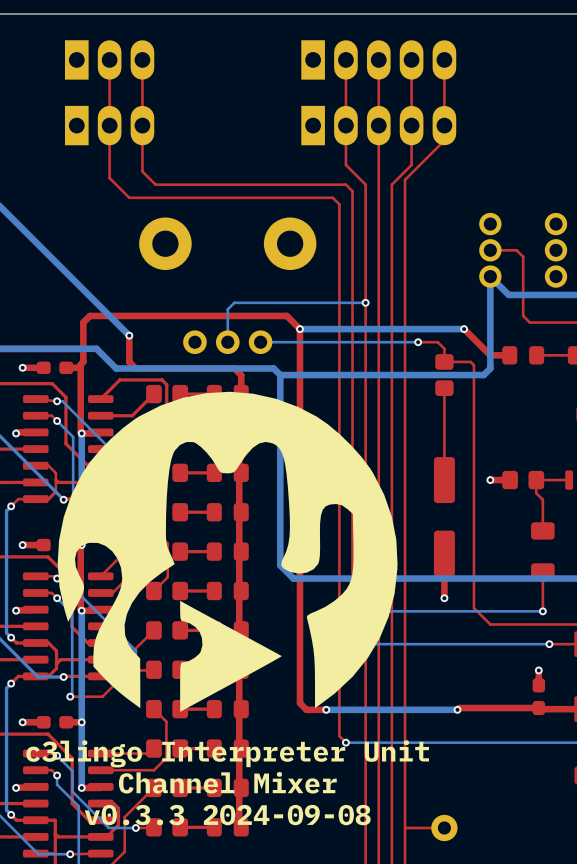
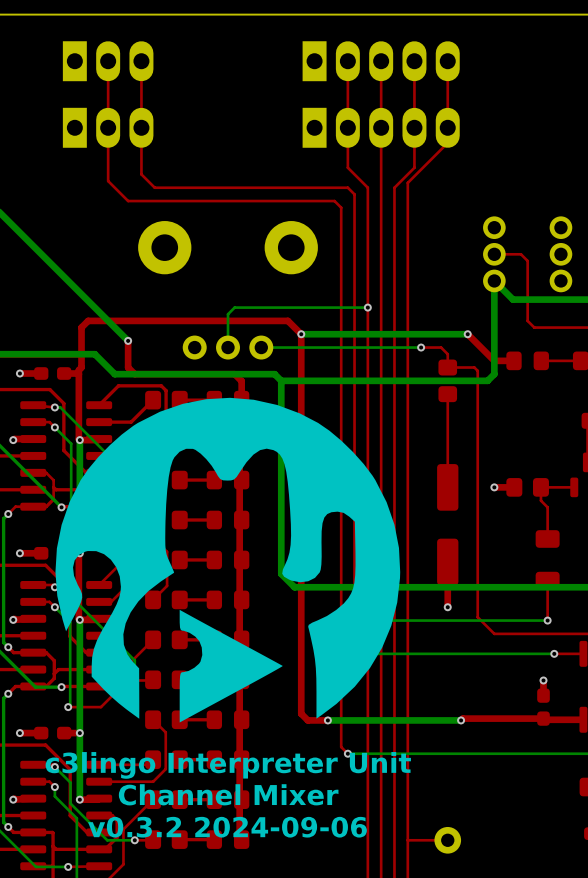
text: v0.3.3 2024-09-08 (227, 815) -> v0.3.2 2024-09-06 (227, 827)

